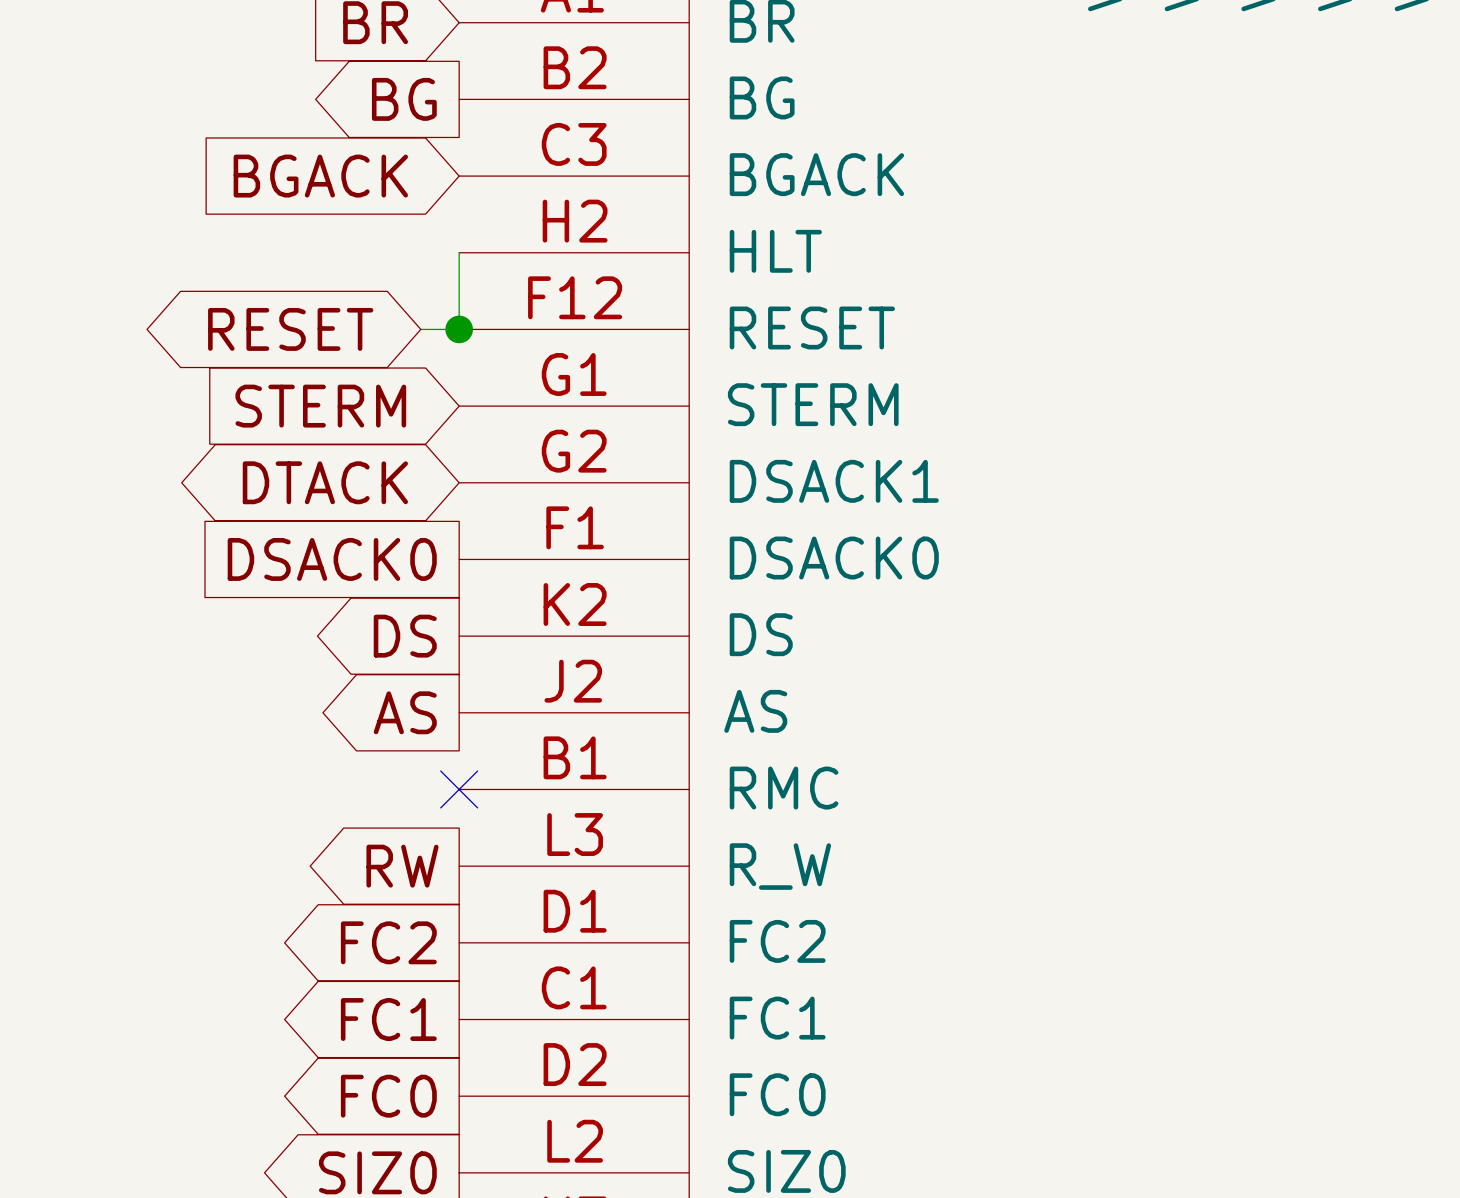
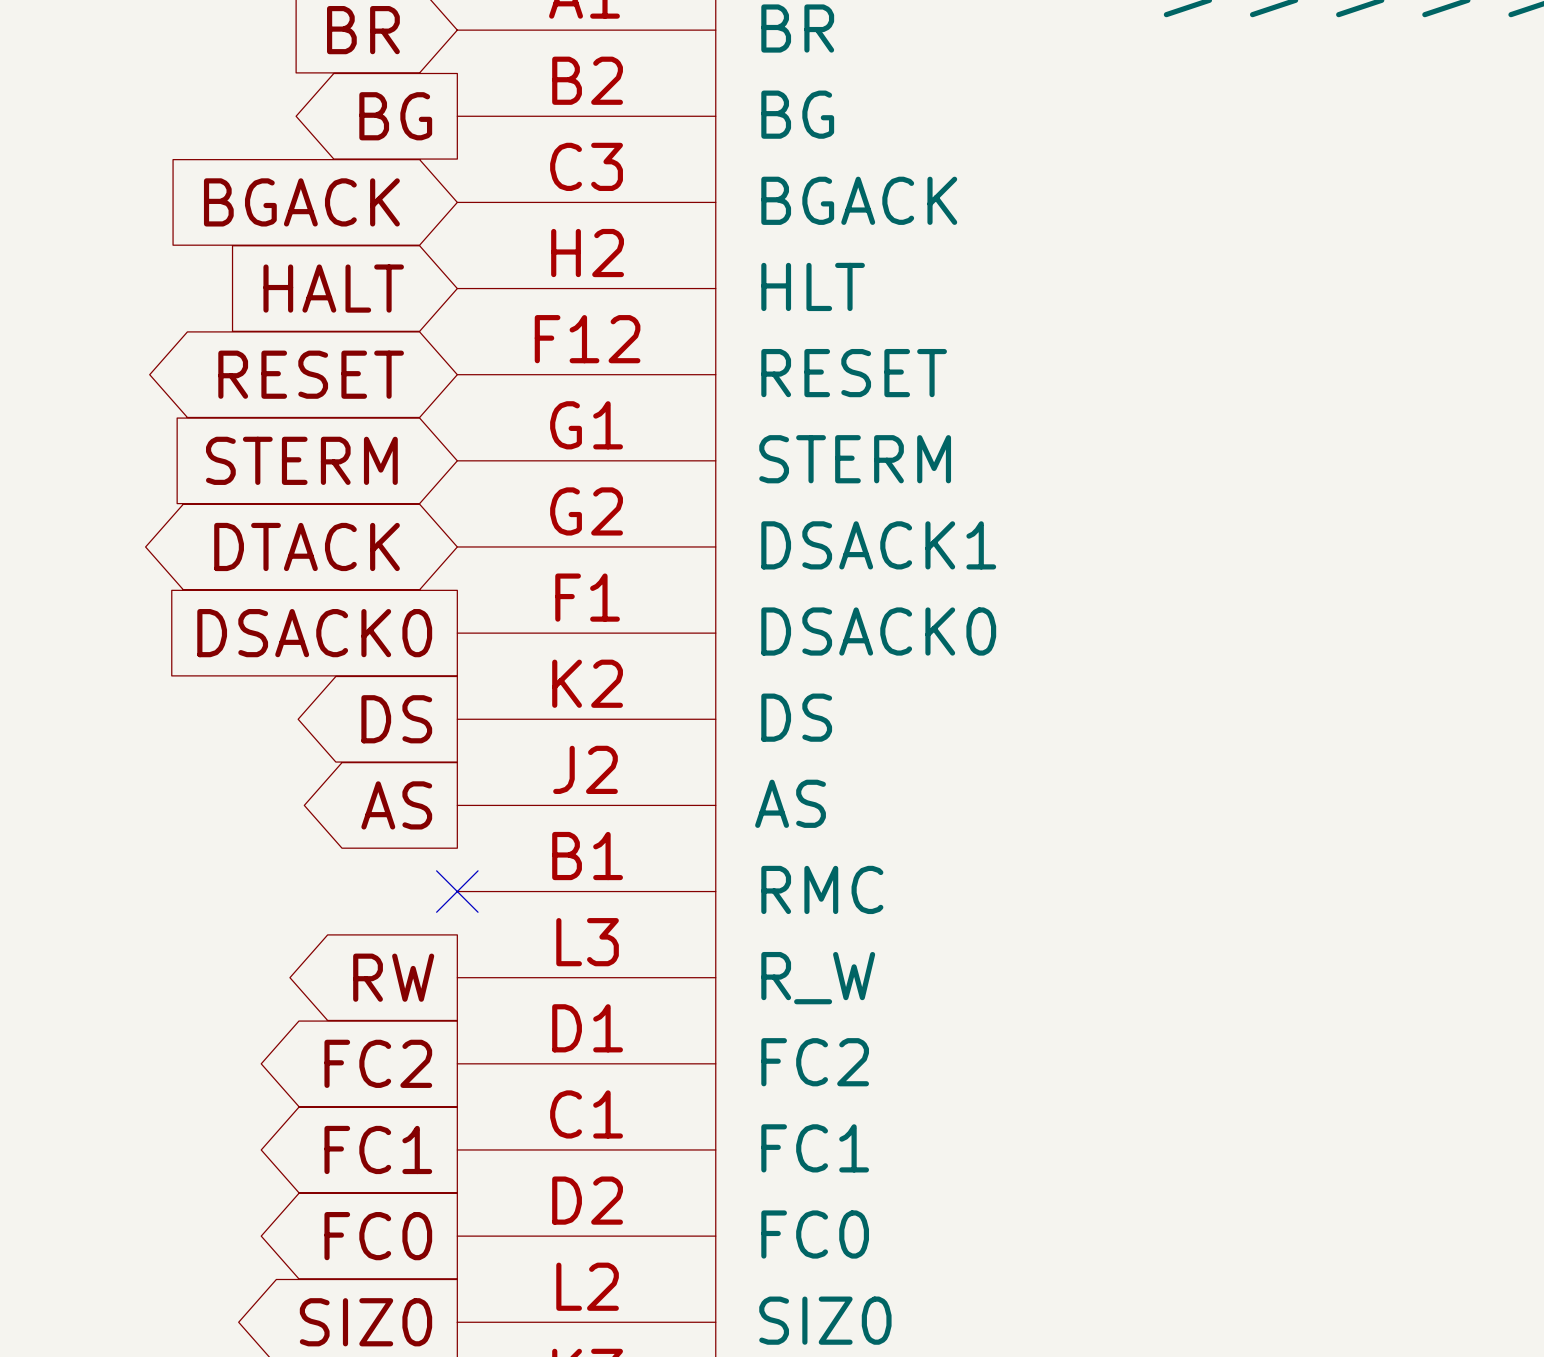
global label: none -> HALT (333, 288)
wire: (459, 252) (459, 329) (420, 329) -> none
global label position: RESET (290, 329) -> RESET (311, 374)
junction: (459, 329) -> none

